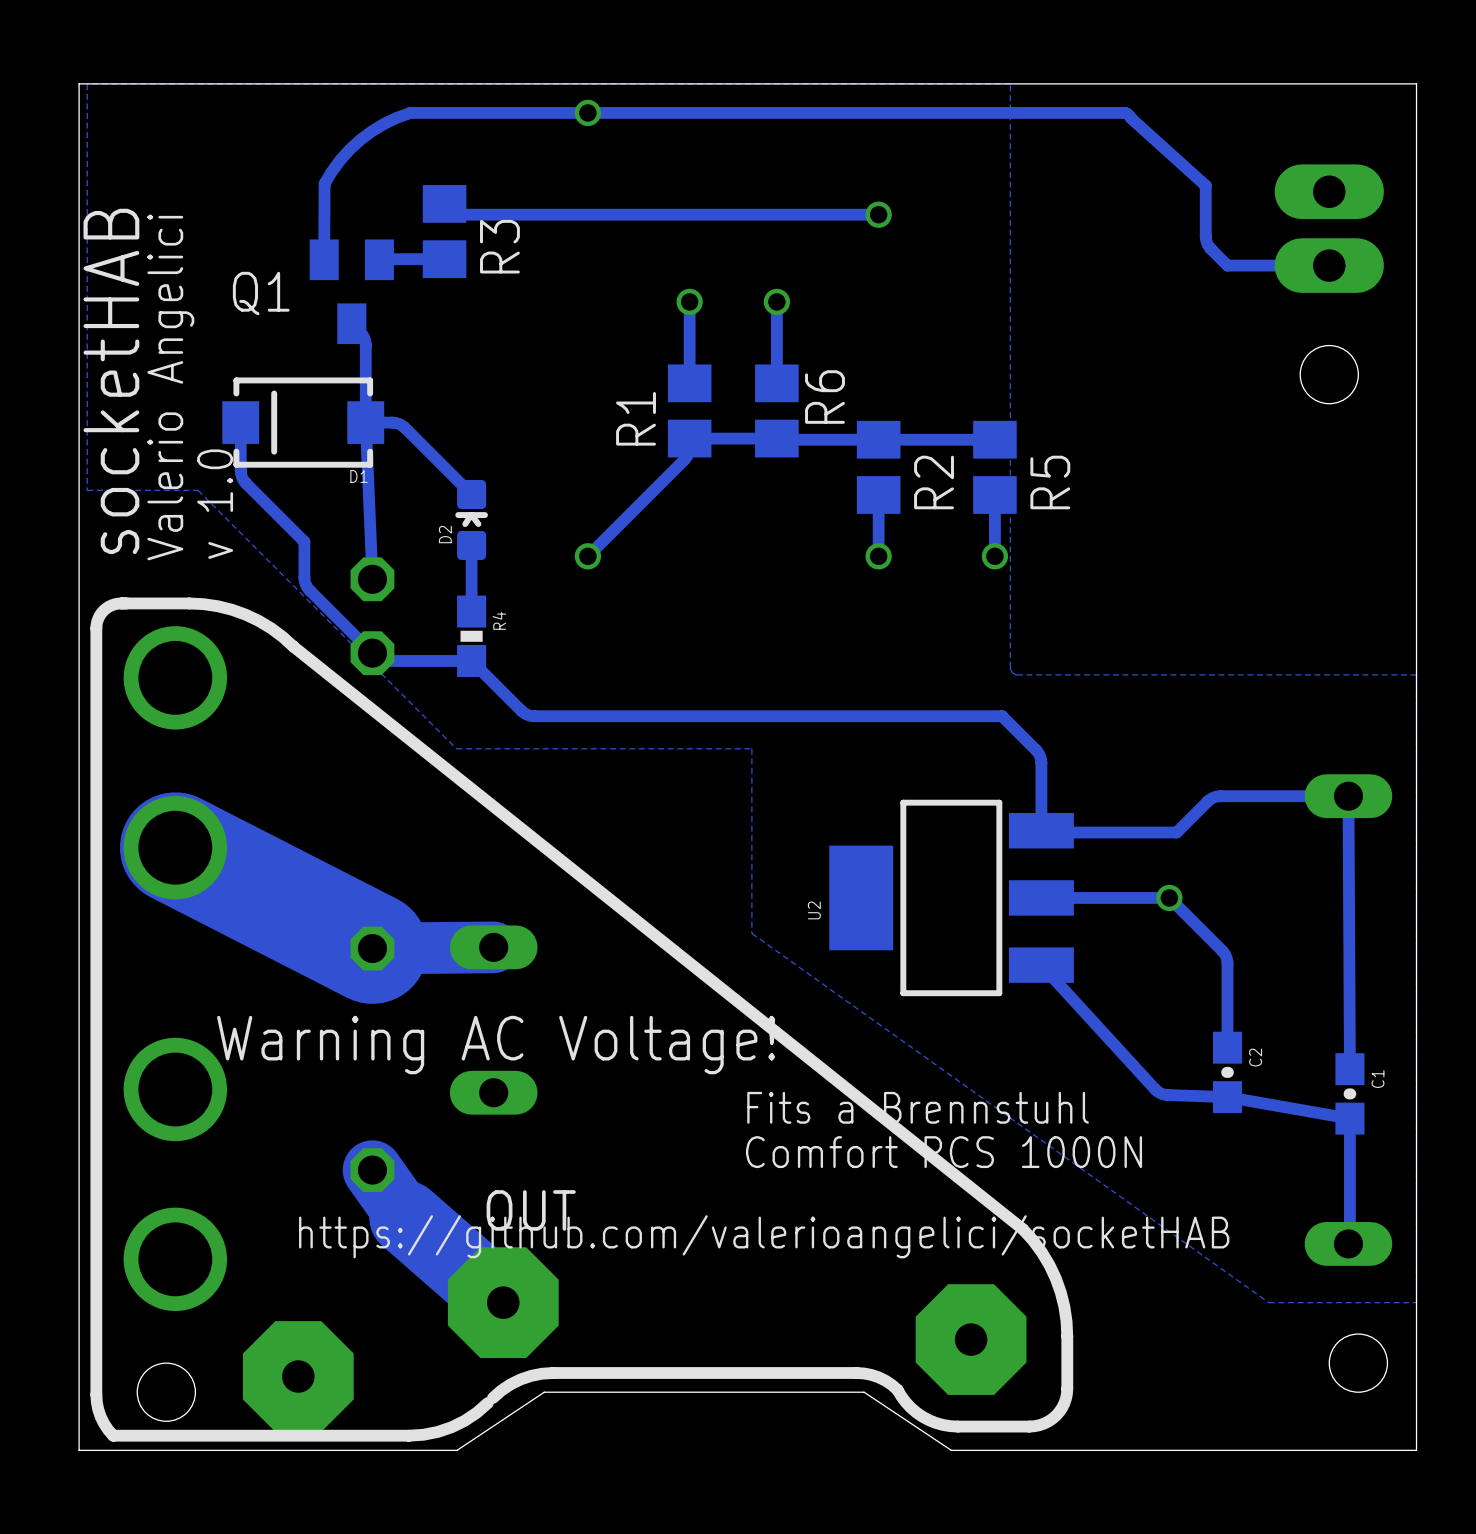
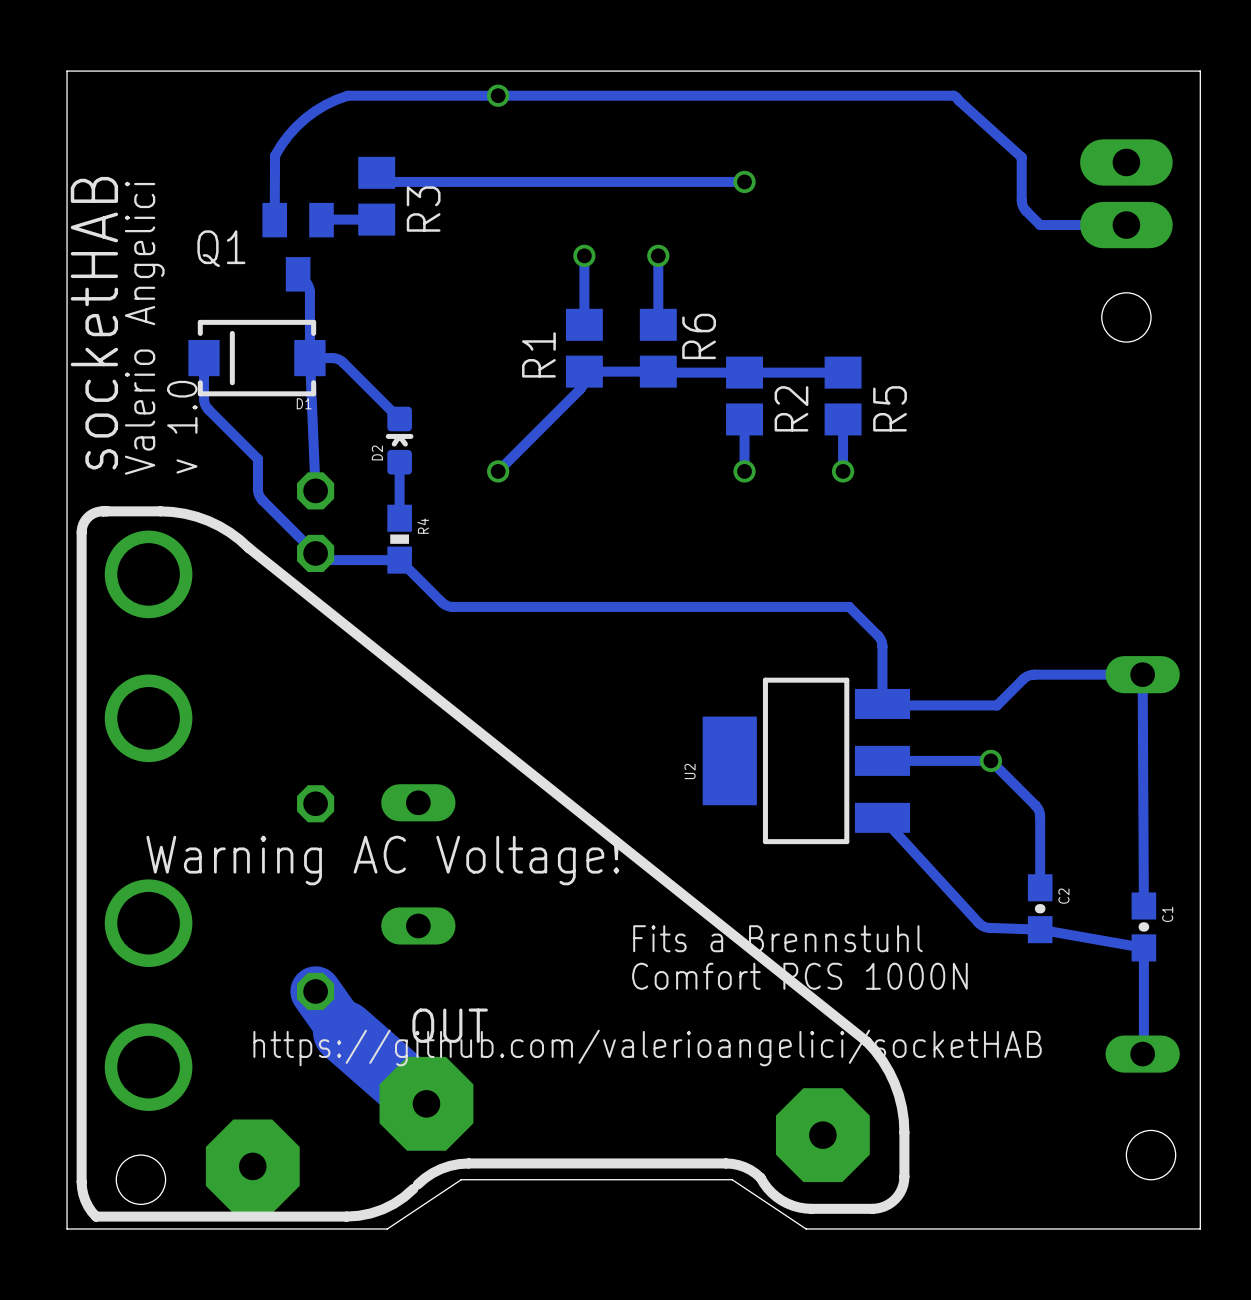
zone outline: (1010, 84) (1010, 667) (1011, 672) (1017, 674) (1416, 674) (1416, 1302) (1268, 1302) (751, 933) (751, 748) (456, 748) (198, 490) (87, 490) (87, 84) (1010, 84) -> none
track: (175, 847) (372, 948) (493, 947) -> none
text position: Warning AC Voltage! (496, 1045) -> Warning AC Voltage! (382, 860)

